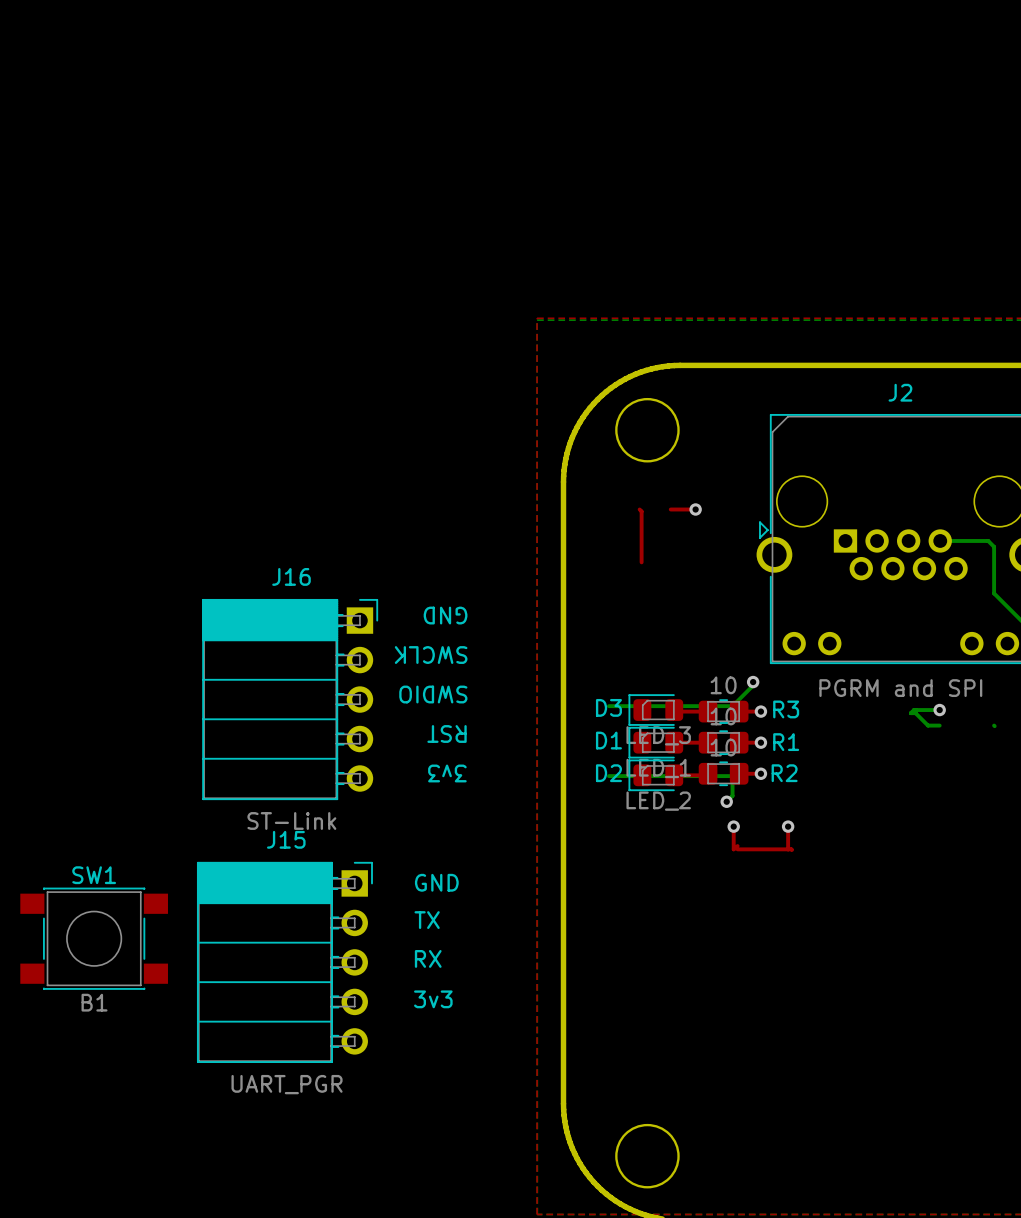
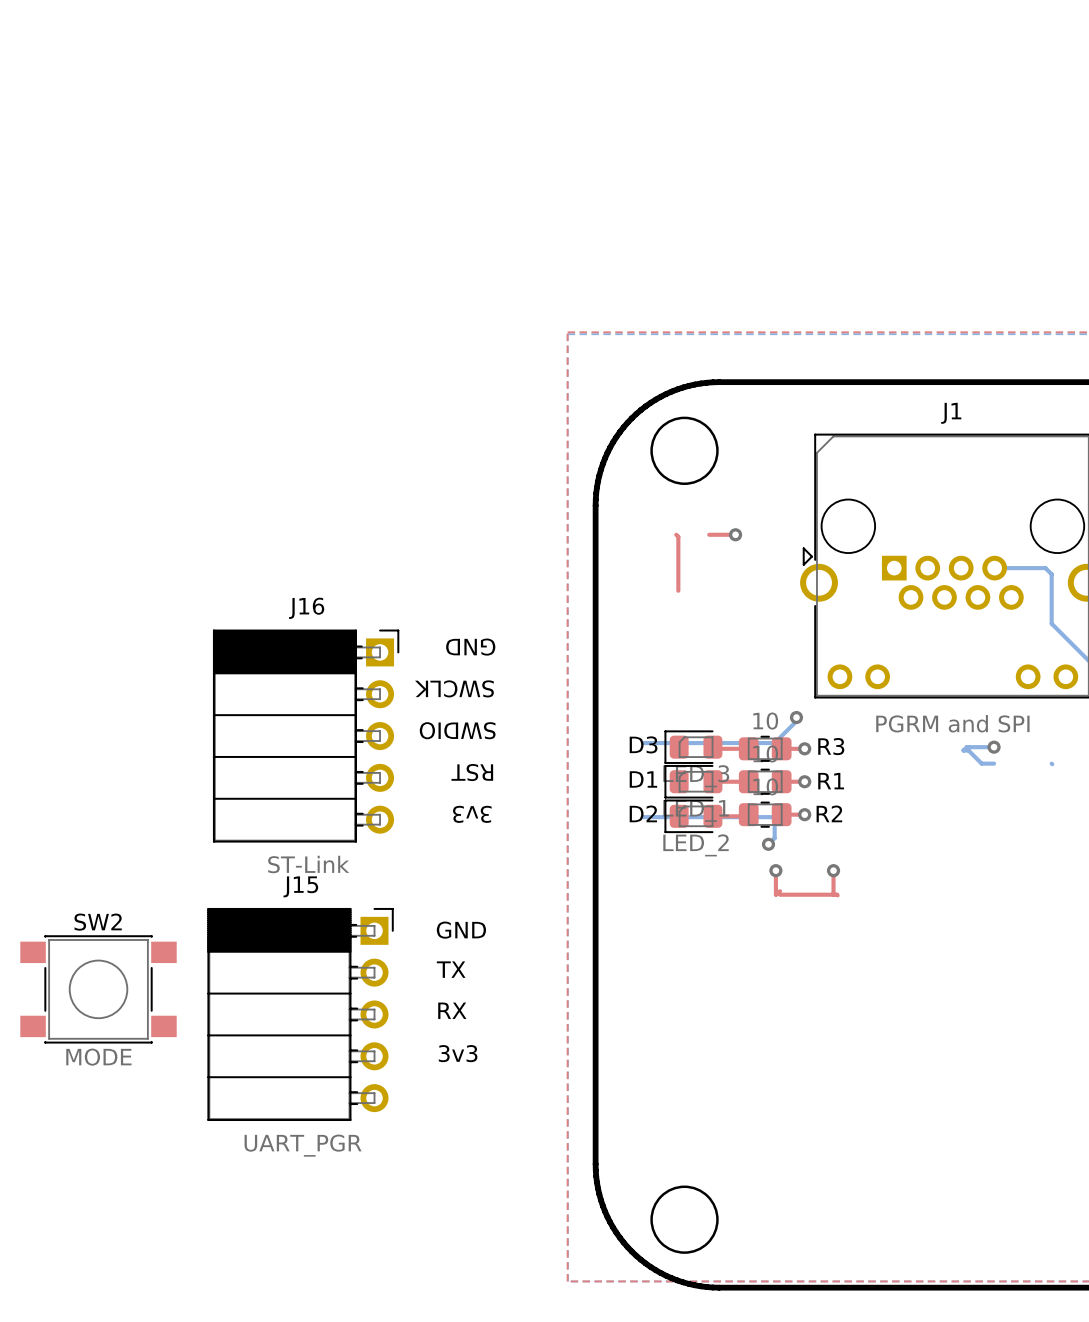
J2 name: J2 (900, 392) -> J1 (951, 413)
SW1 name: SW1 (94, 875) -> SW2 (98, 922)
SW1 value: B1 (94, 1002) -> MODE (98, 1057)

